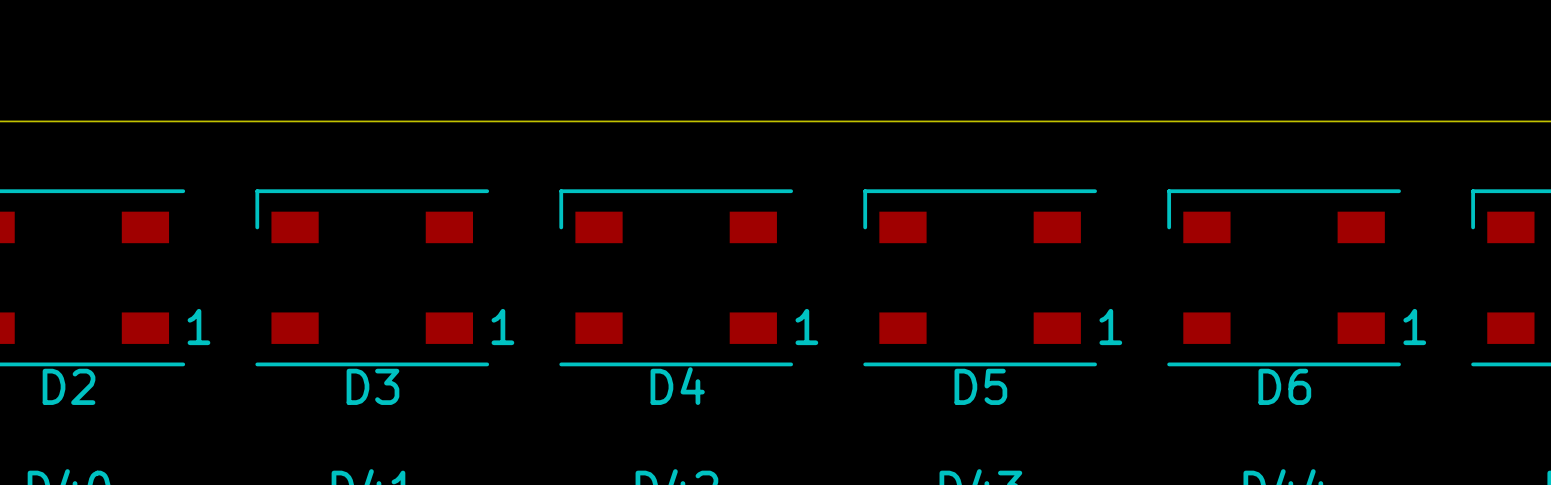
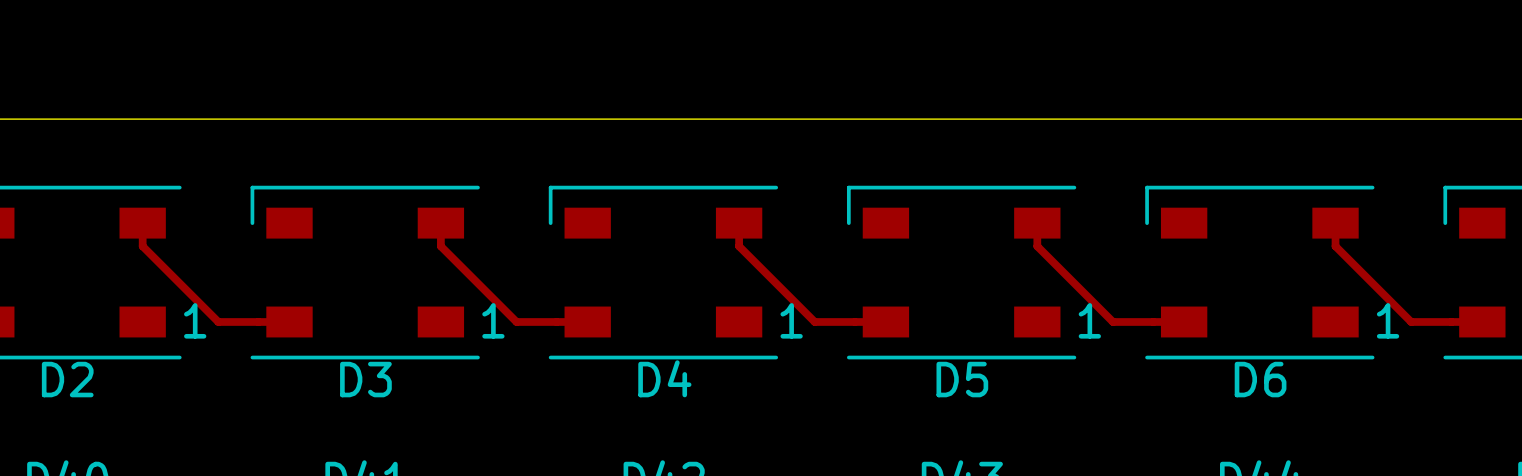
track: none -> (142, 223) (142, 246) (218, 321) (289, 321)
track: none -> (440, 223) (440, 246) (516, 321) (587, 321)
track: none -> (739, 223) (739, 246) (814, 321) (885, 321)
track: none -> (1037, 223) (1037, 246) (1113, 321) (1184, 321)
track: none -> (1335, 223) (1335, 246) (1411, 321) (1482, 321)

